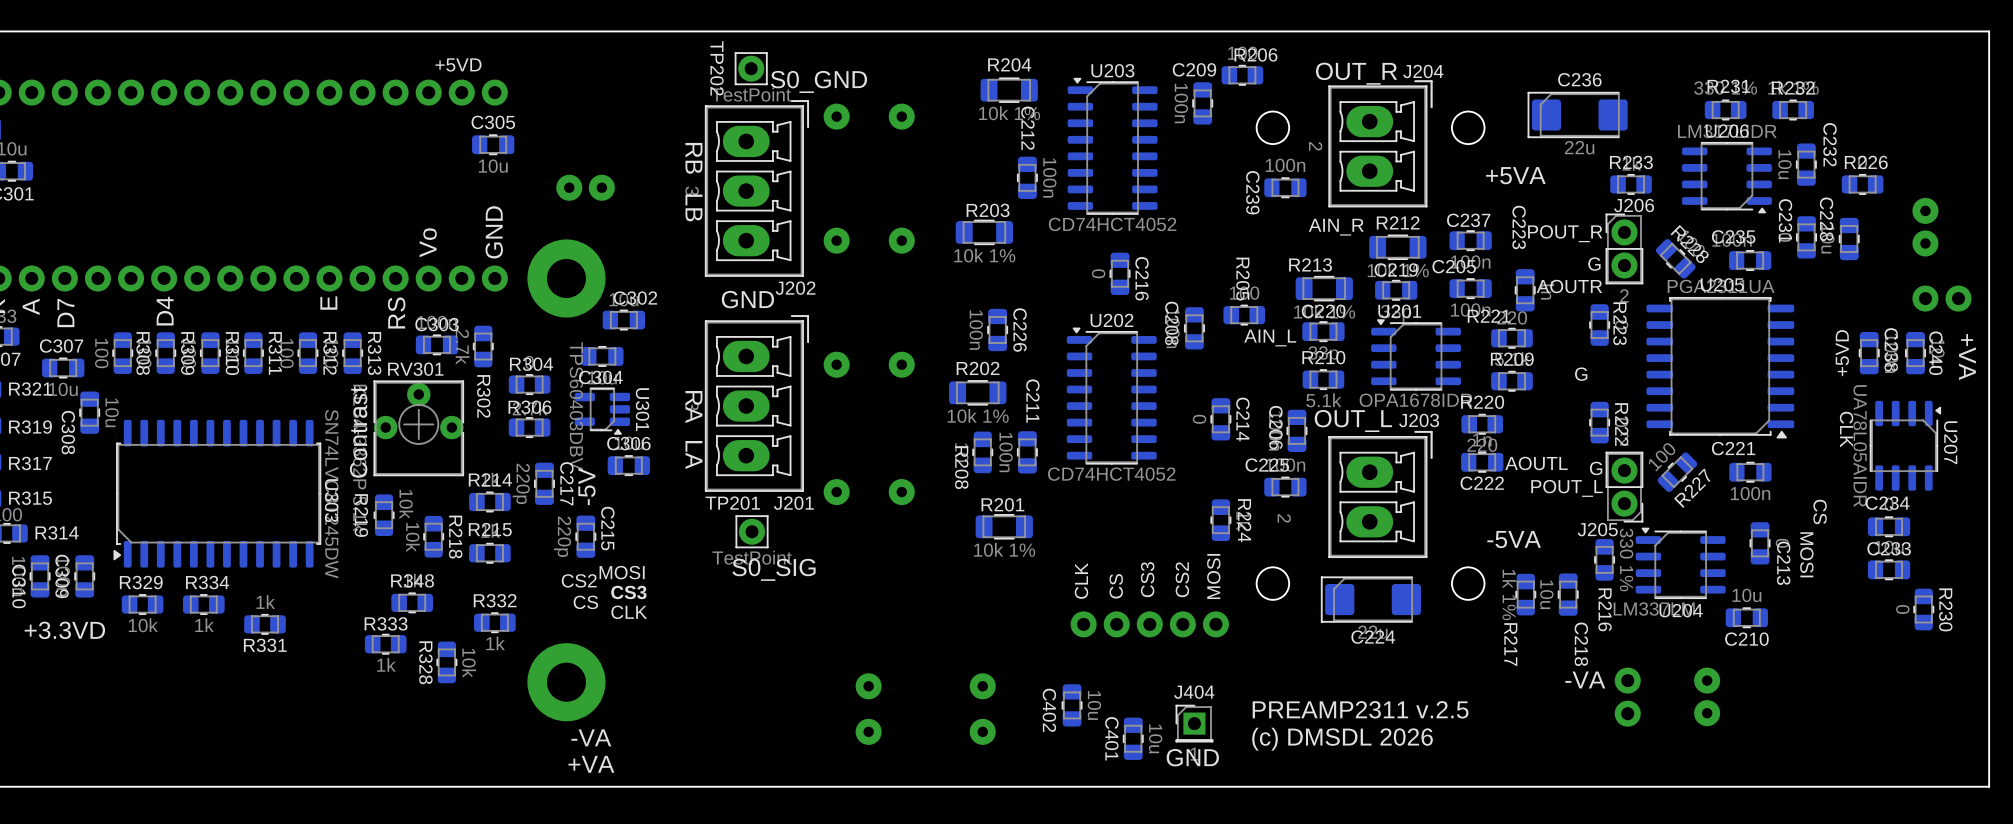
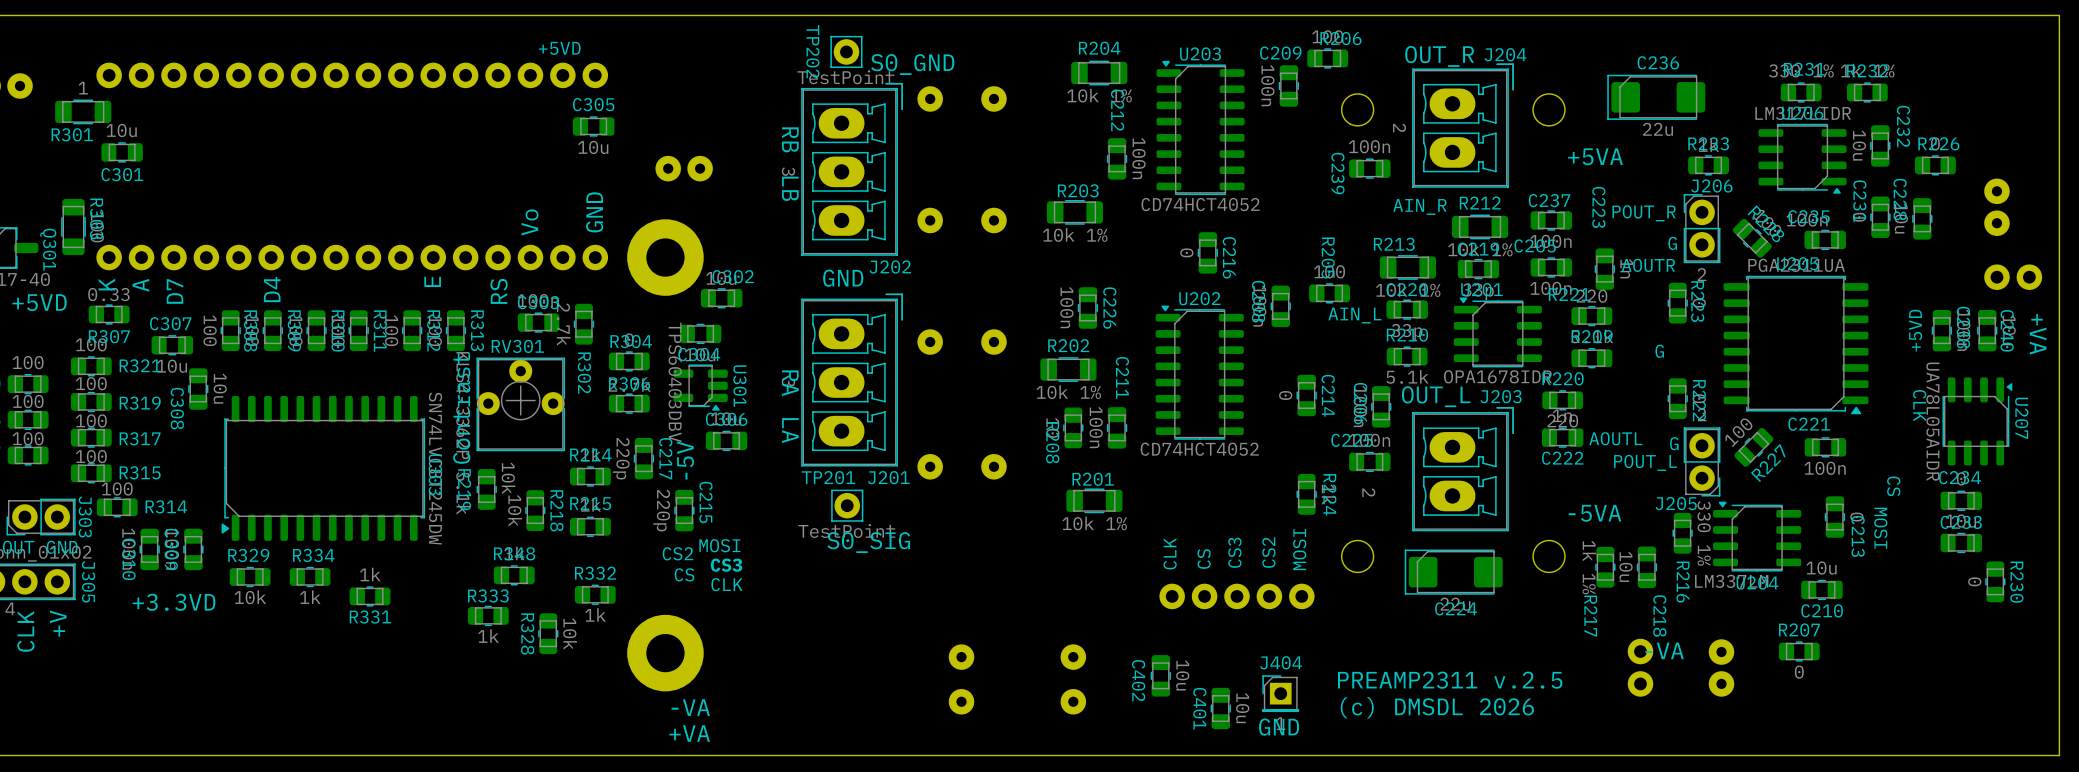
R207: none -> 0 (1799, 651)
part position: (1707, 696) -> (1721, 667)
part position: (1627, 697) -> (1640, 667)

